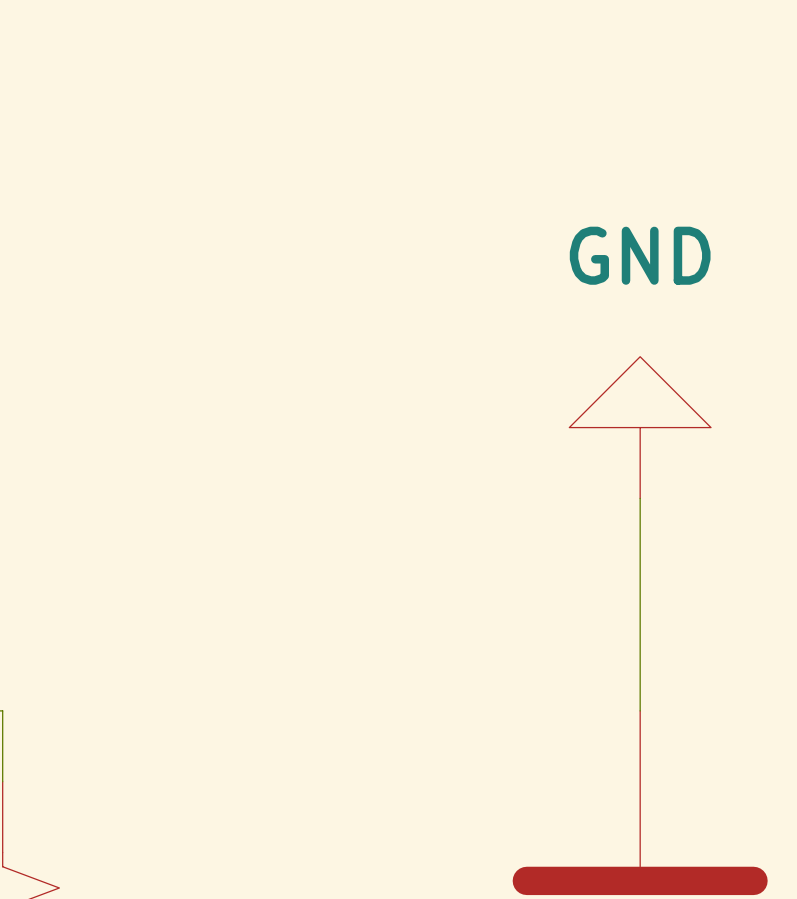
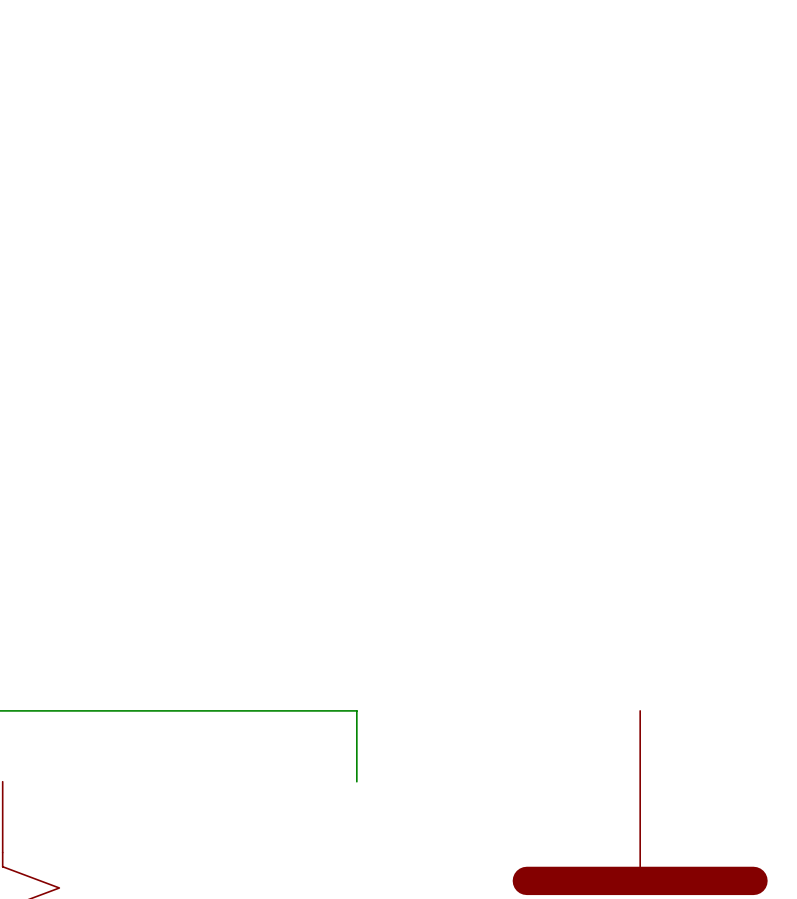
power symbol: GND (640, 427) -> none
wire: (640, 498) (640, 710) -> none
wire: (2, 710) (2, 781) -> (2, 710) (356, 710) (356, 781)

